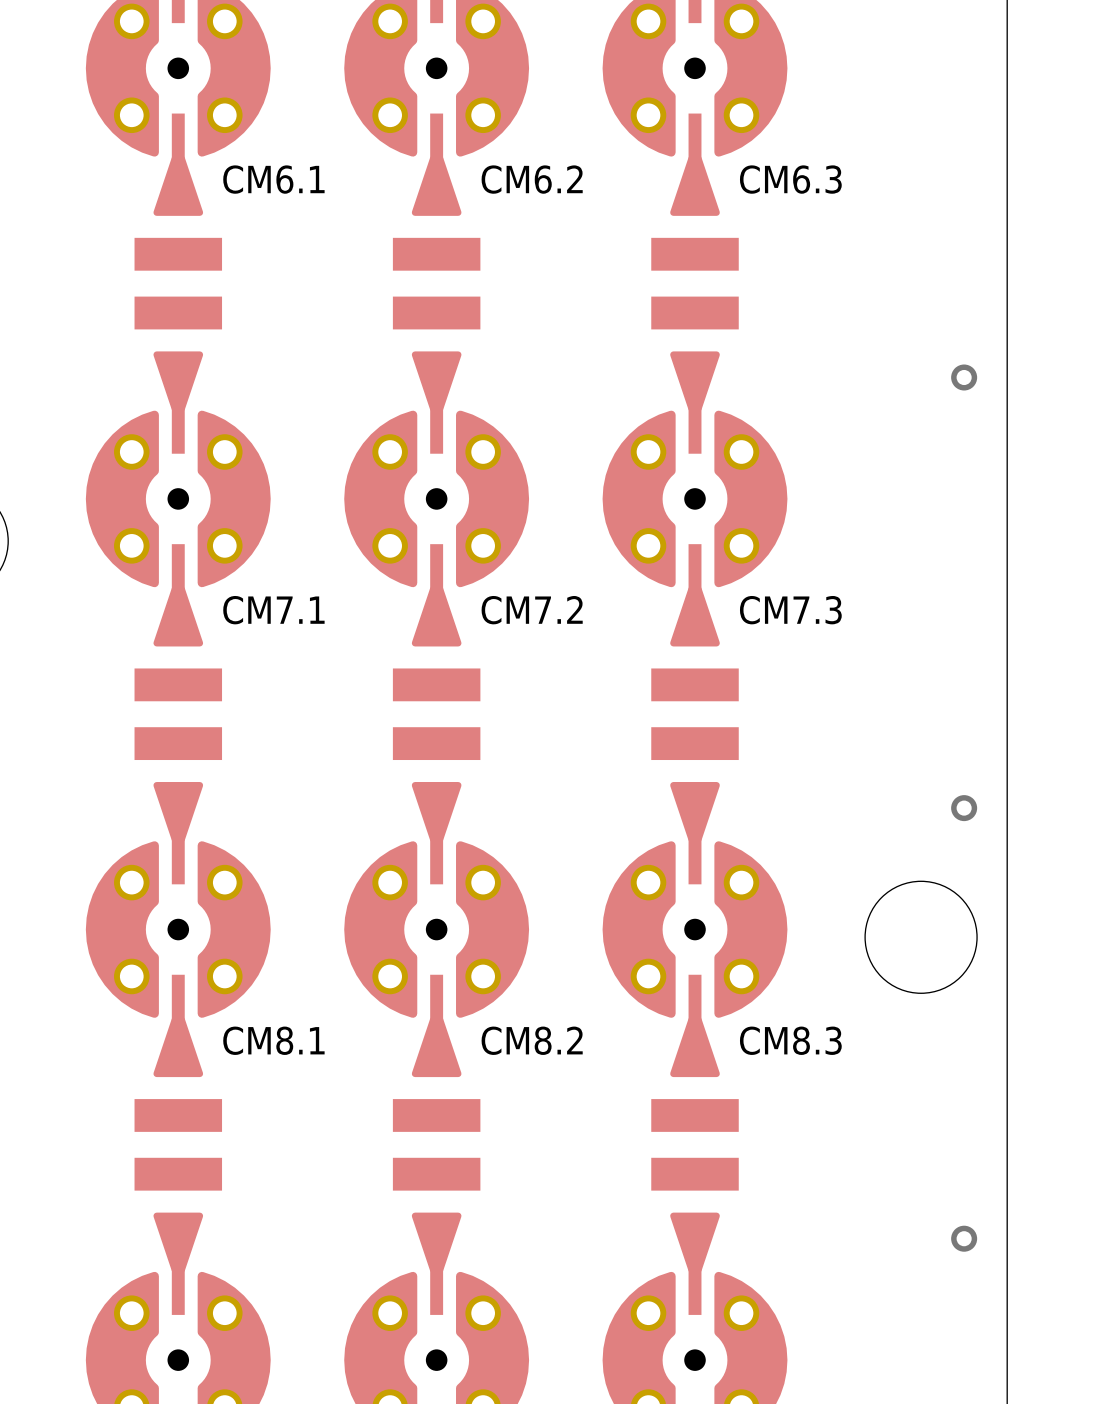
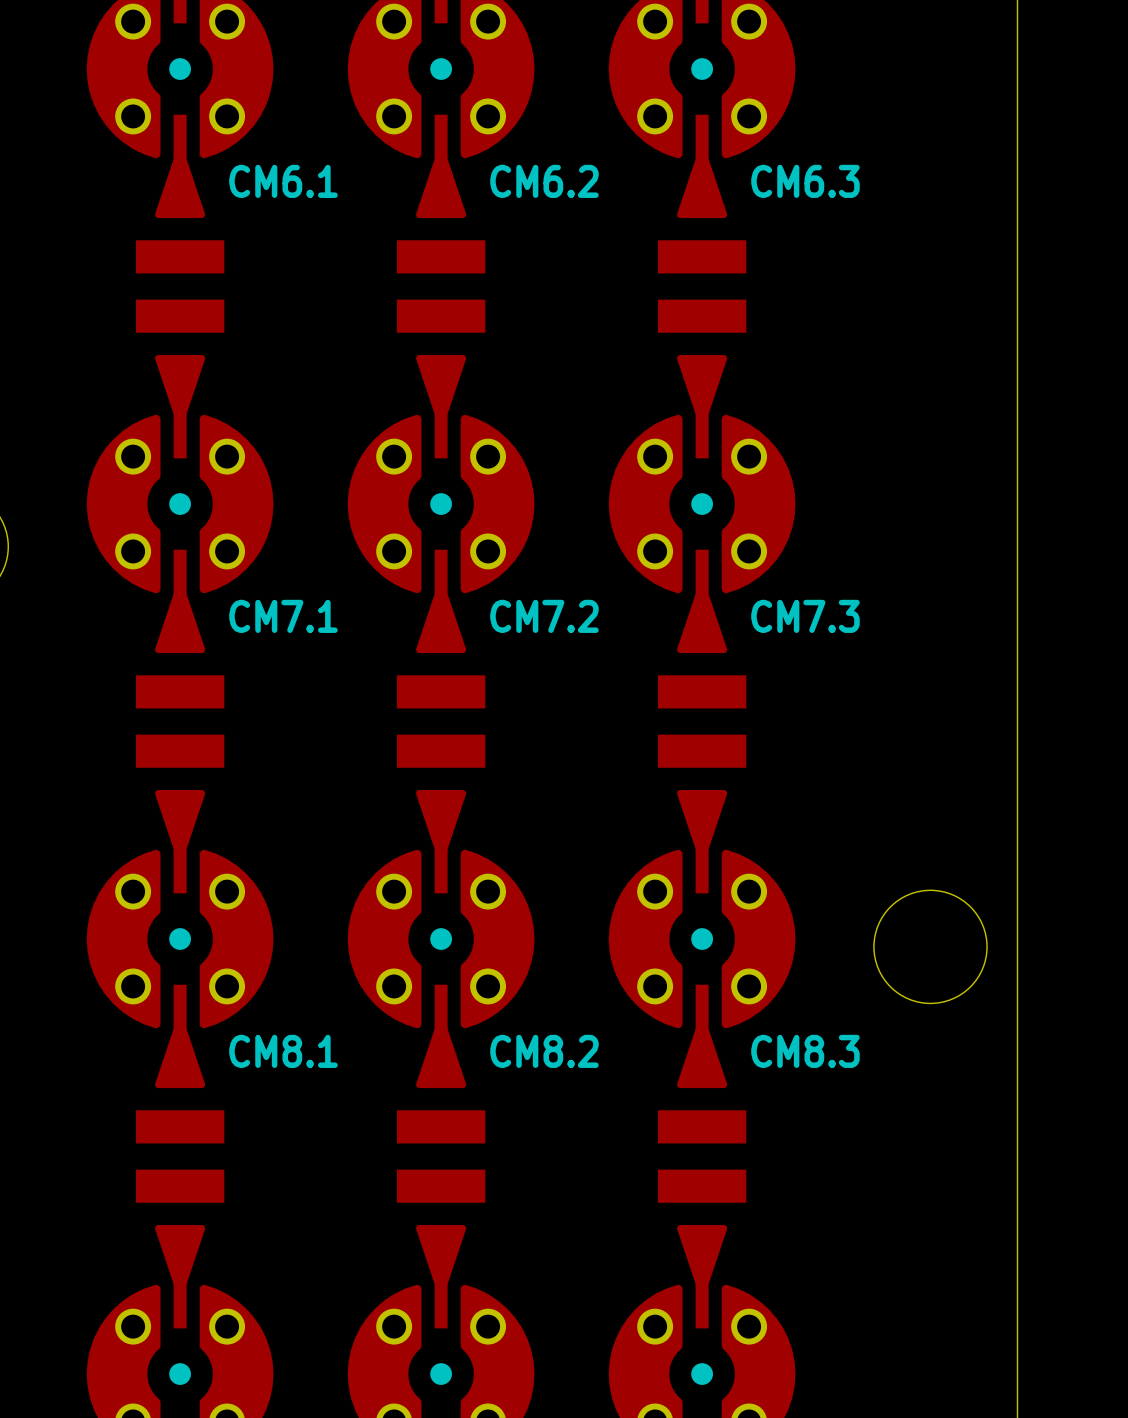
via: (964, 377) -> none
via: (964, 808) -> none
via: (964, 1238) -> none

